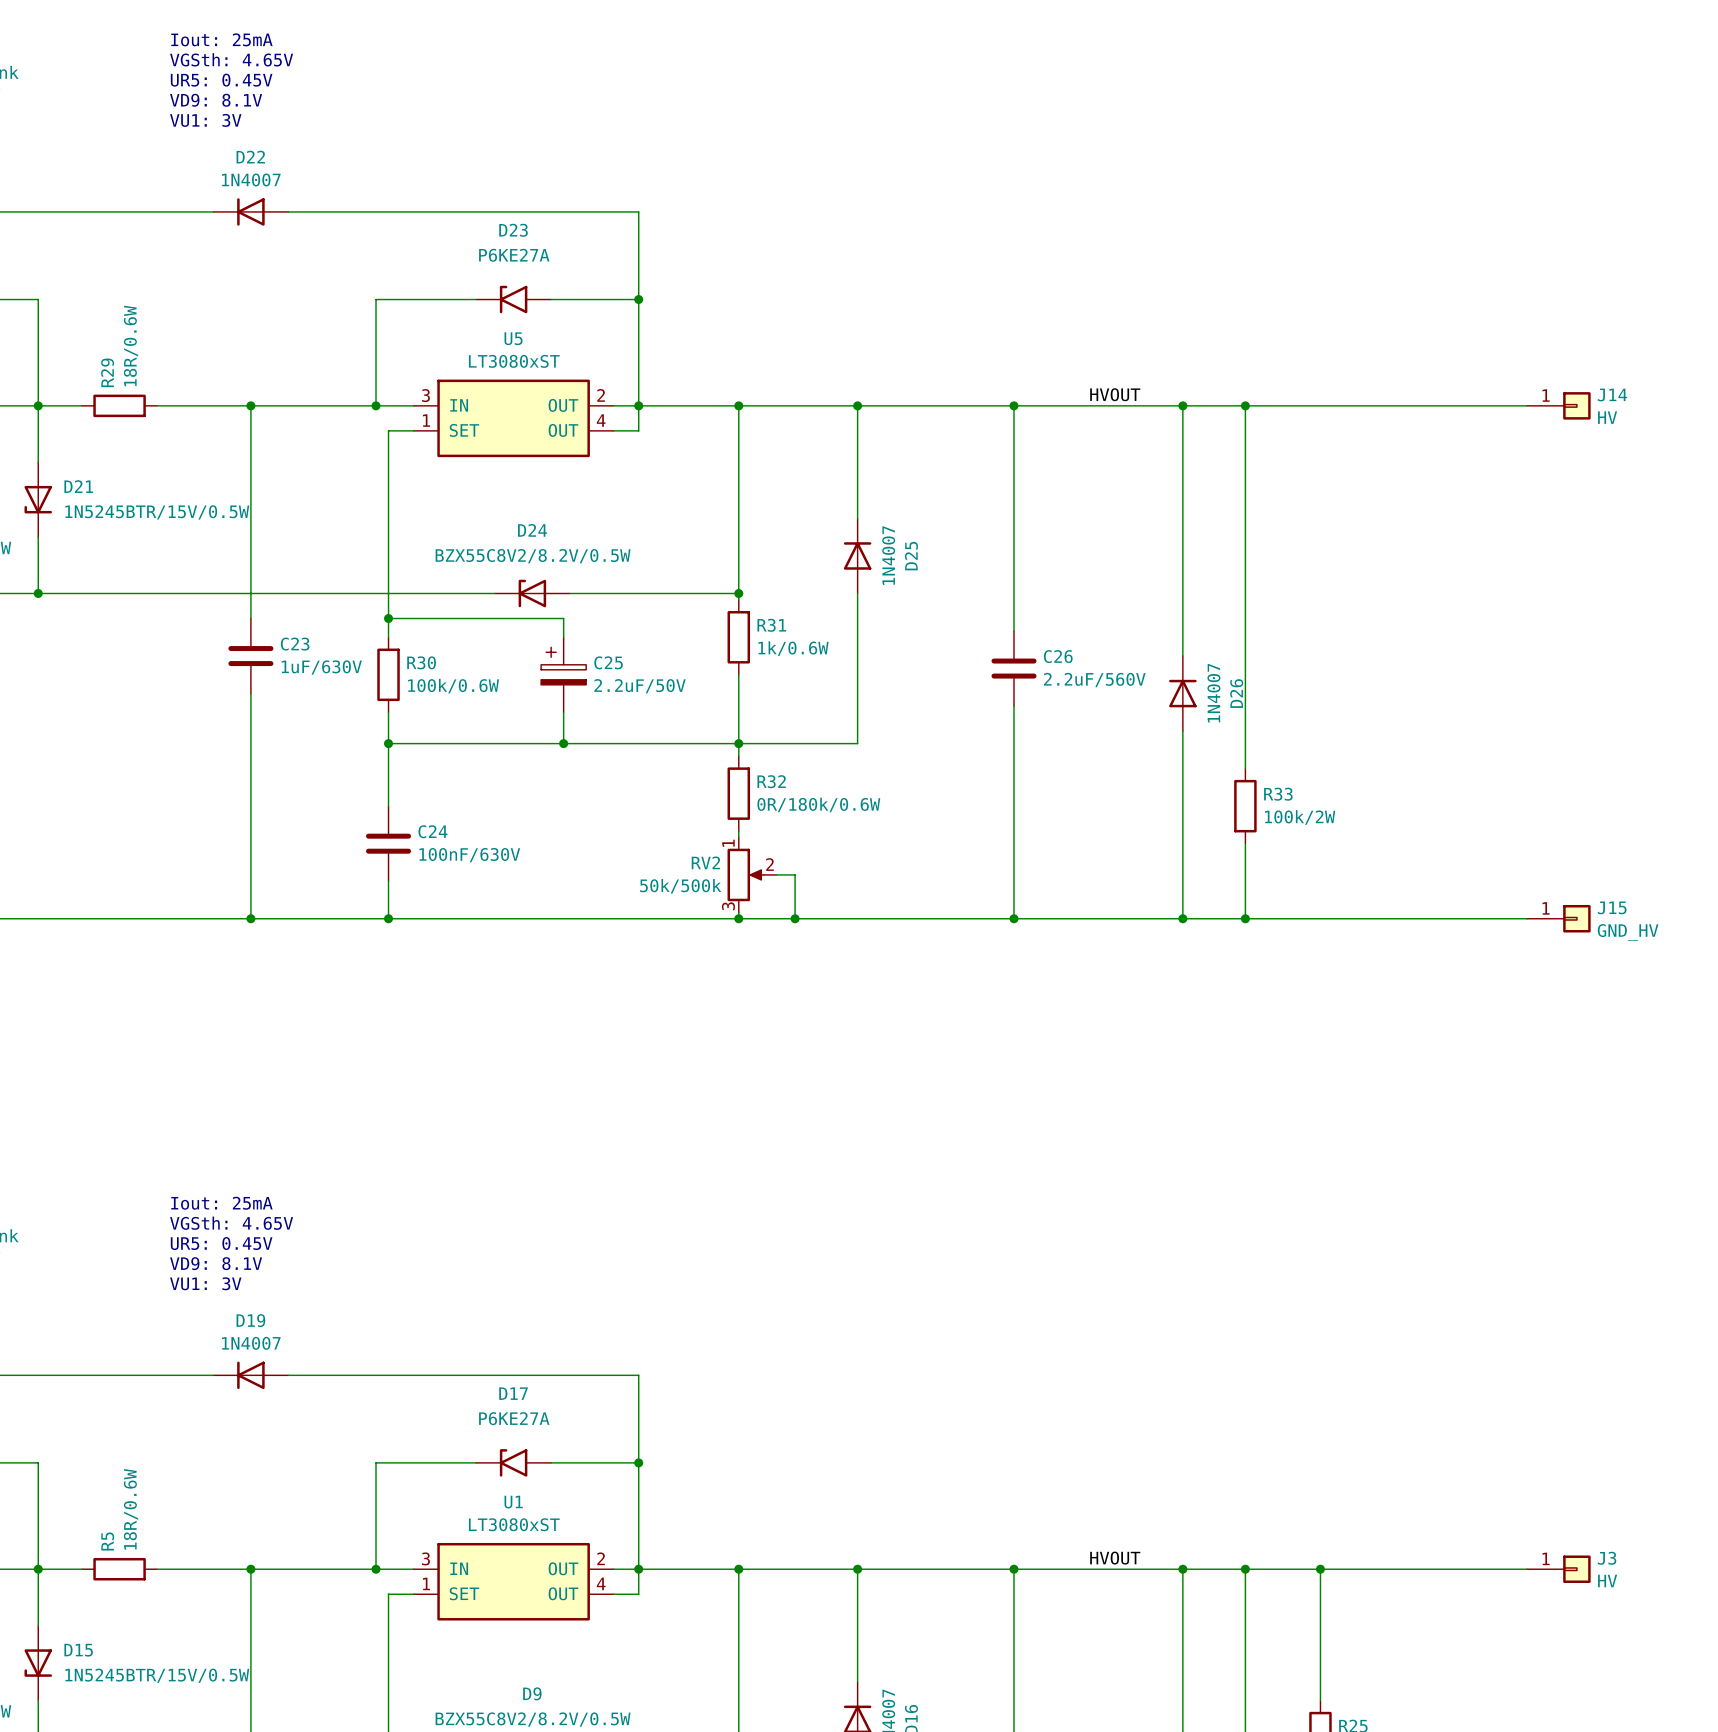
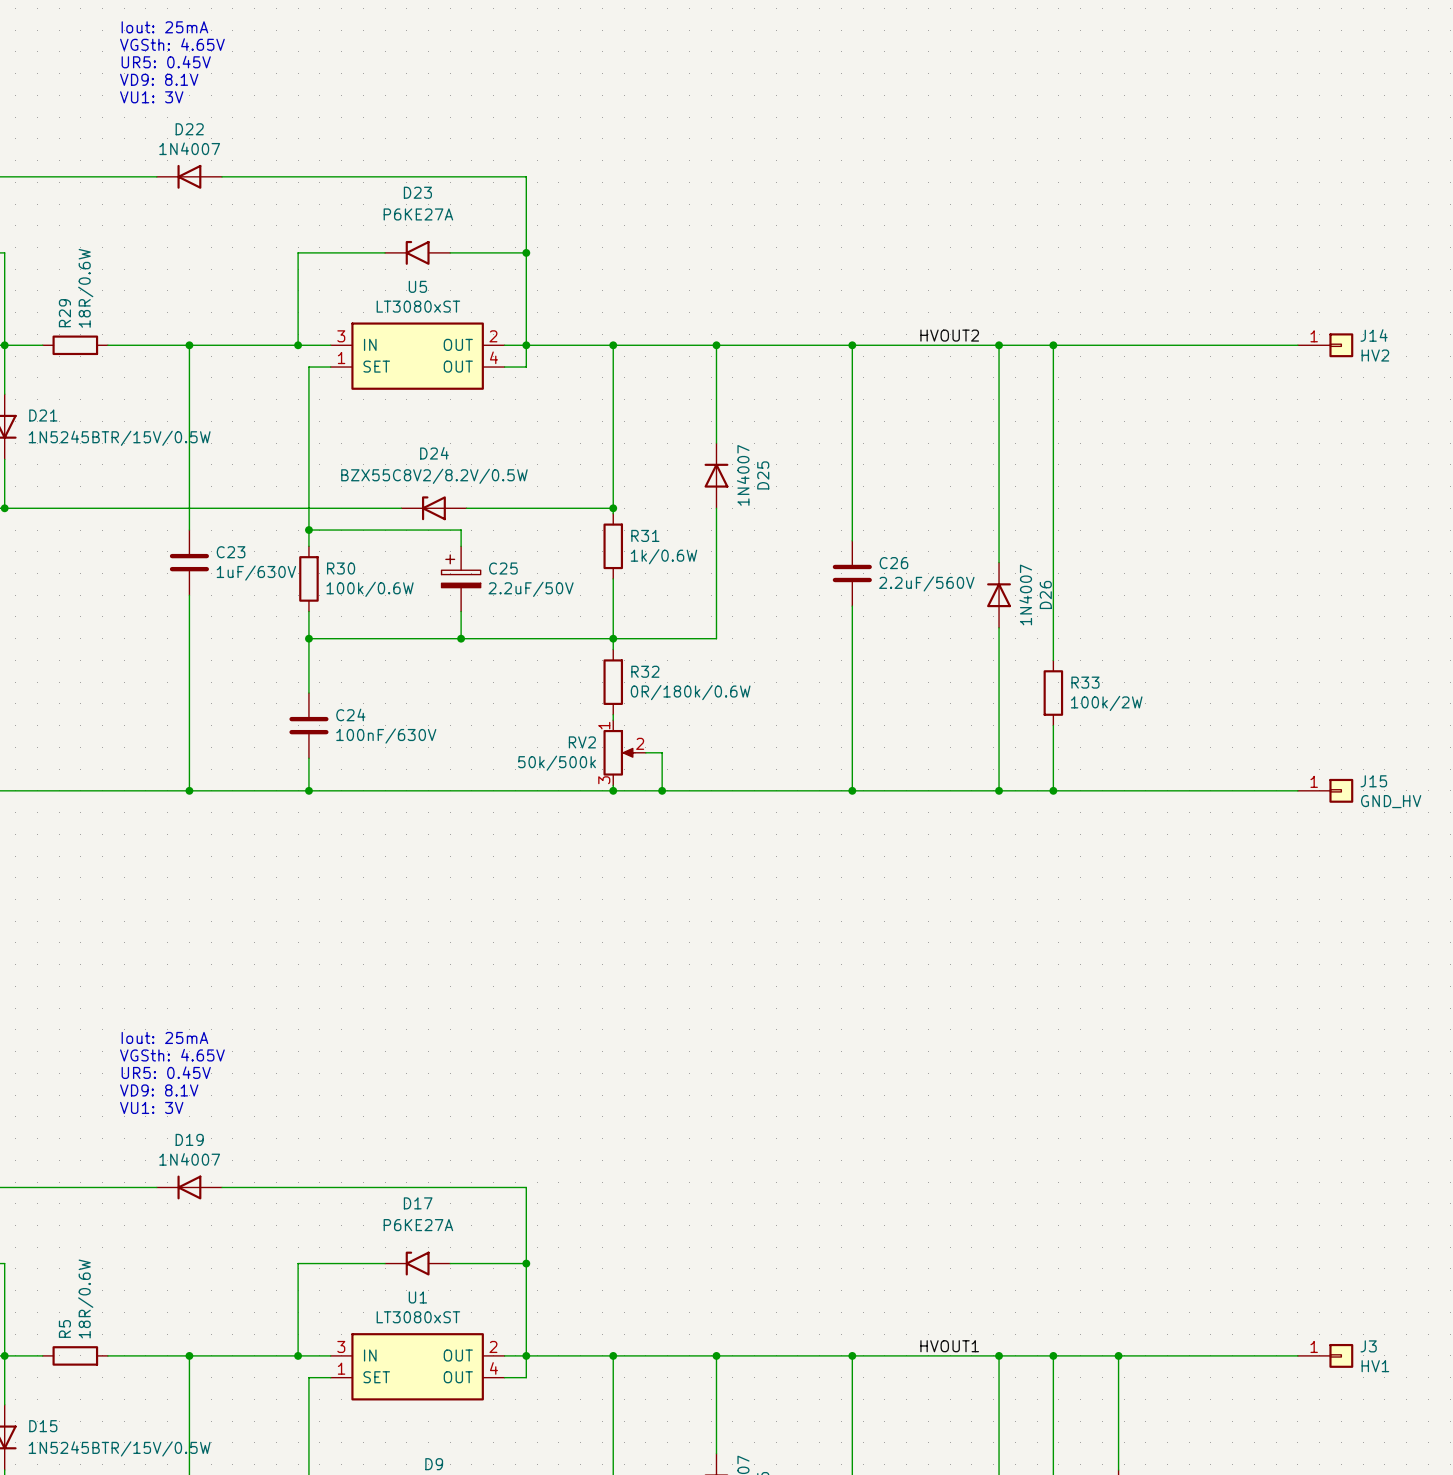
label: HVOUT (1115, 394) -> HVOUT2 (949, 335)
J14 value: HV (1607, 417) -> HV2 (1375, 355)
label: HVOUT (1115, 1558) -> HVOUT1 (949, 1346)
J3 value: HV (1607, 1581) -> HV1 (1375, 1366)

